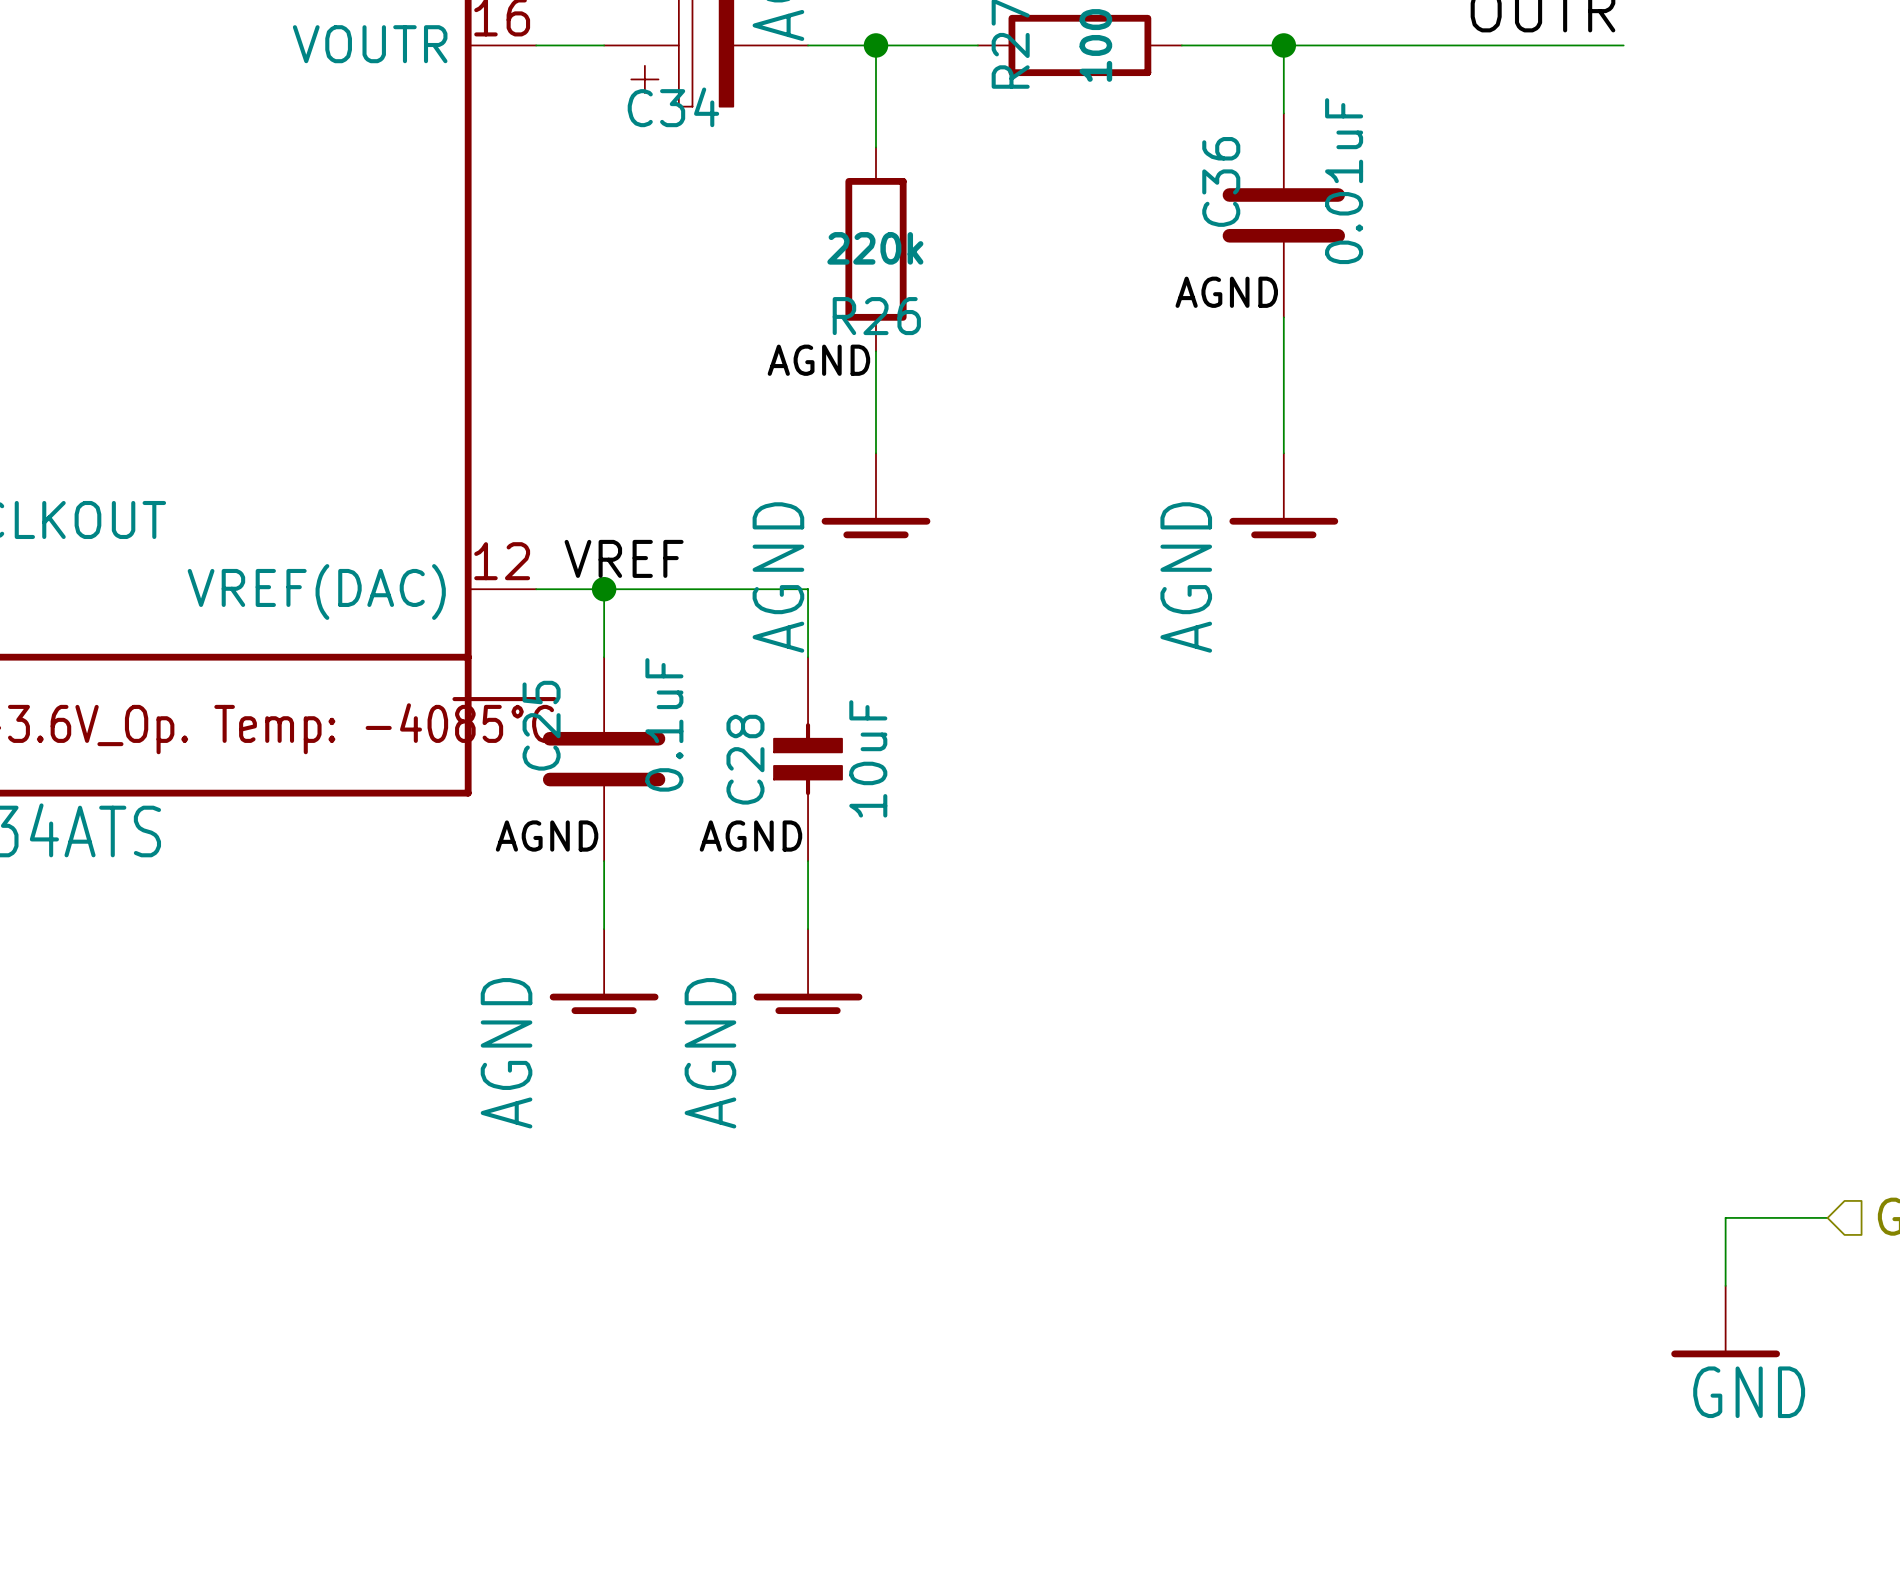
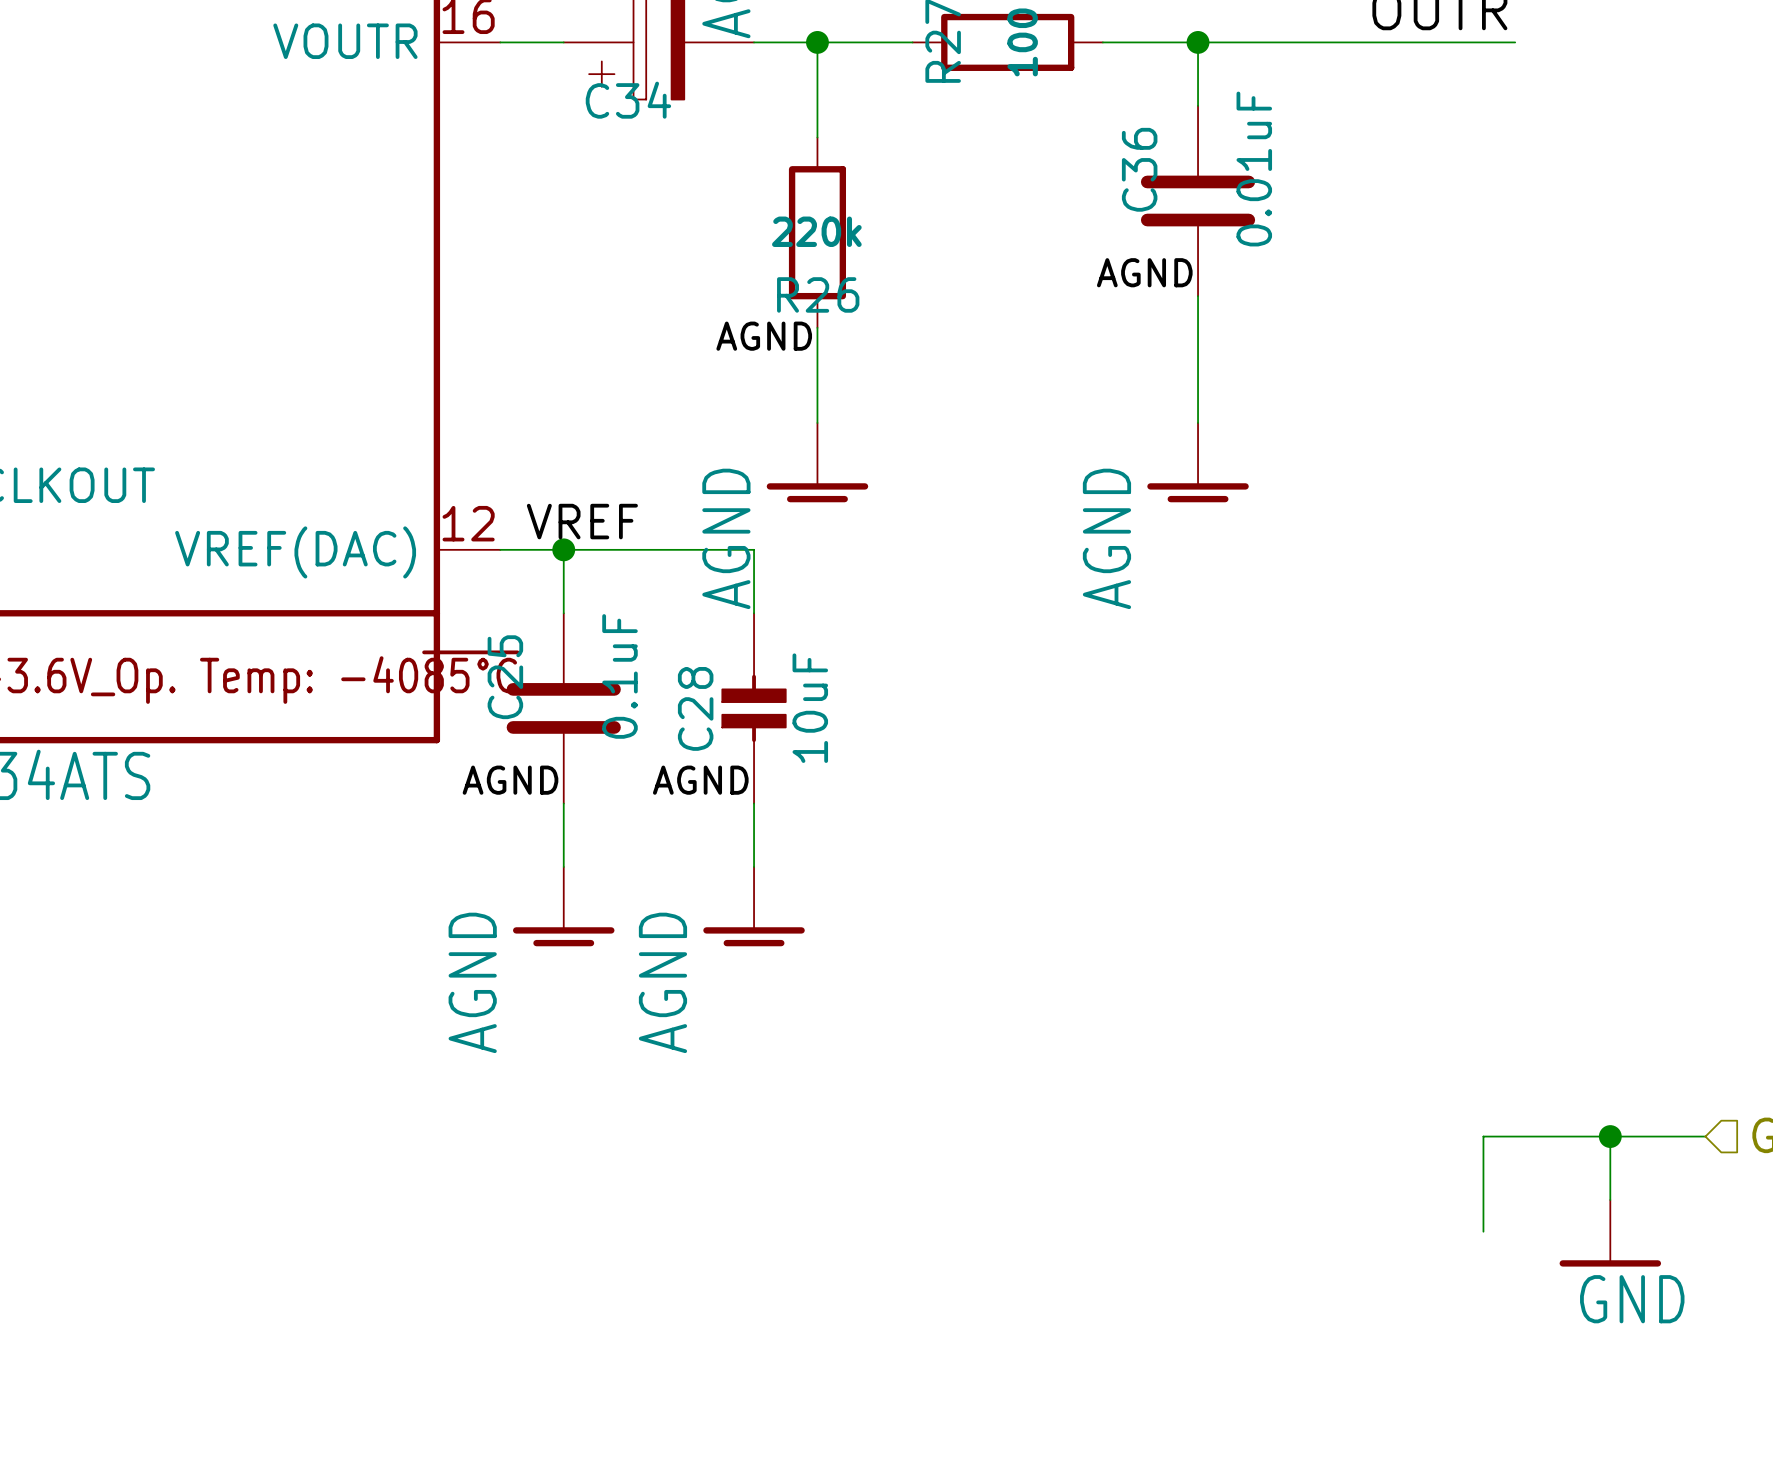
wire: none -> (1610, 1136) (1483, 1136) (1483, 1231)
junction: none -> (1610, 1136)

